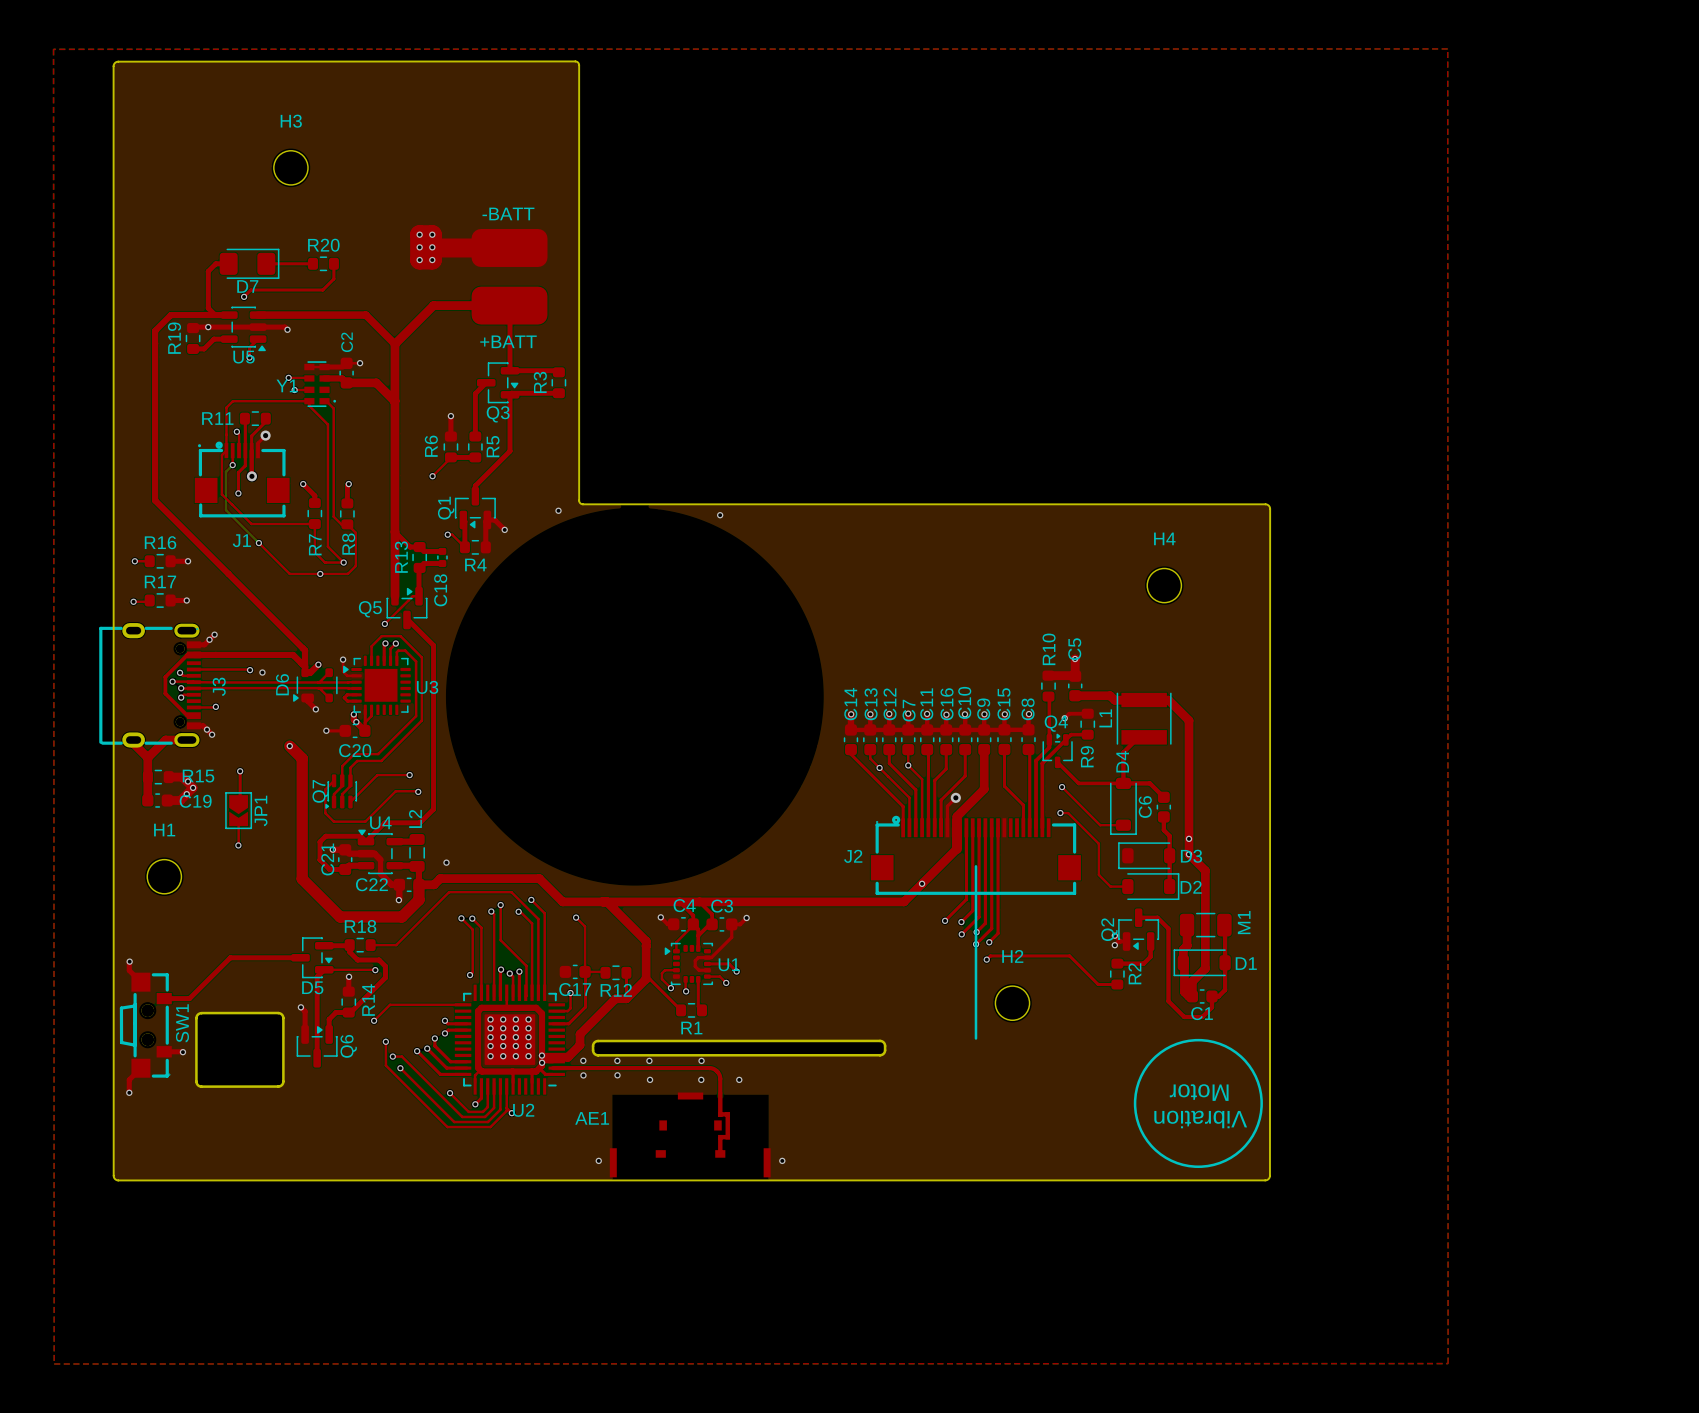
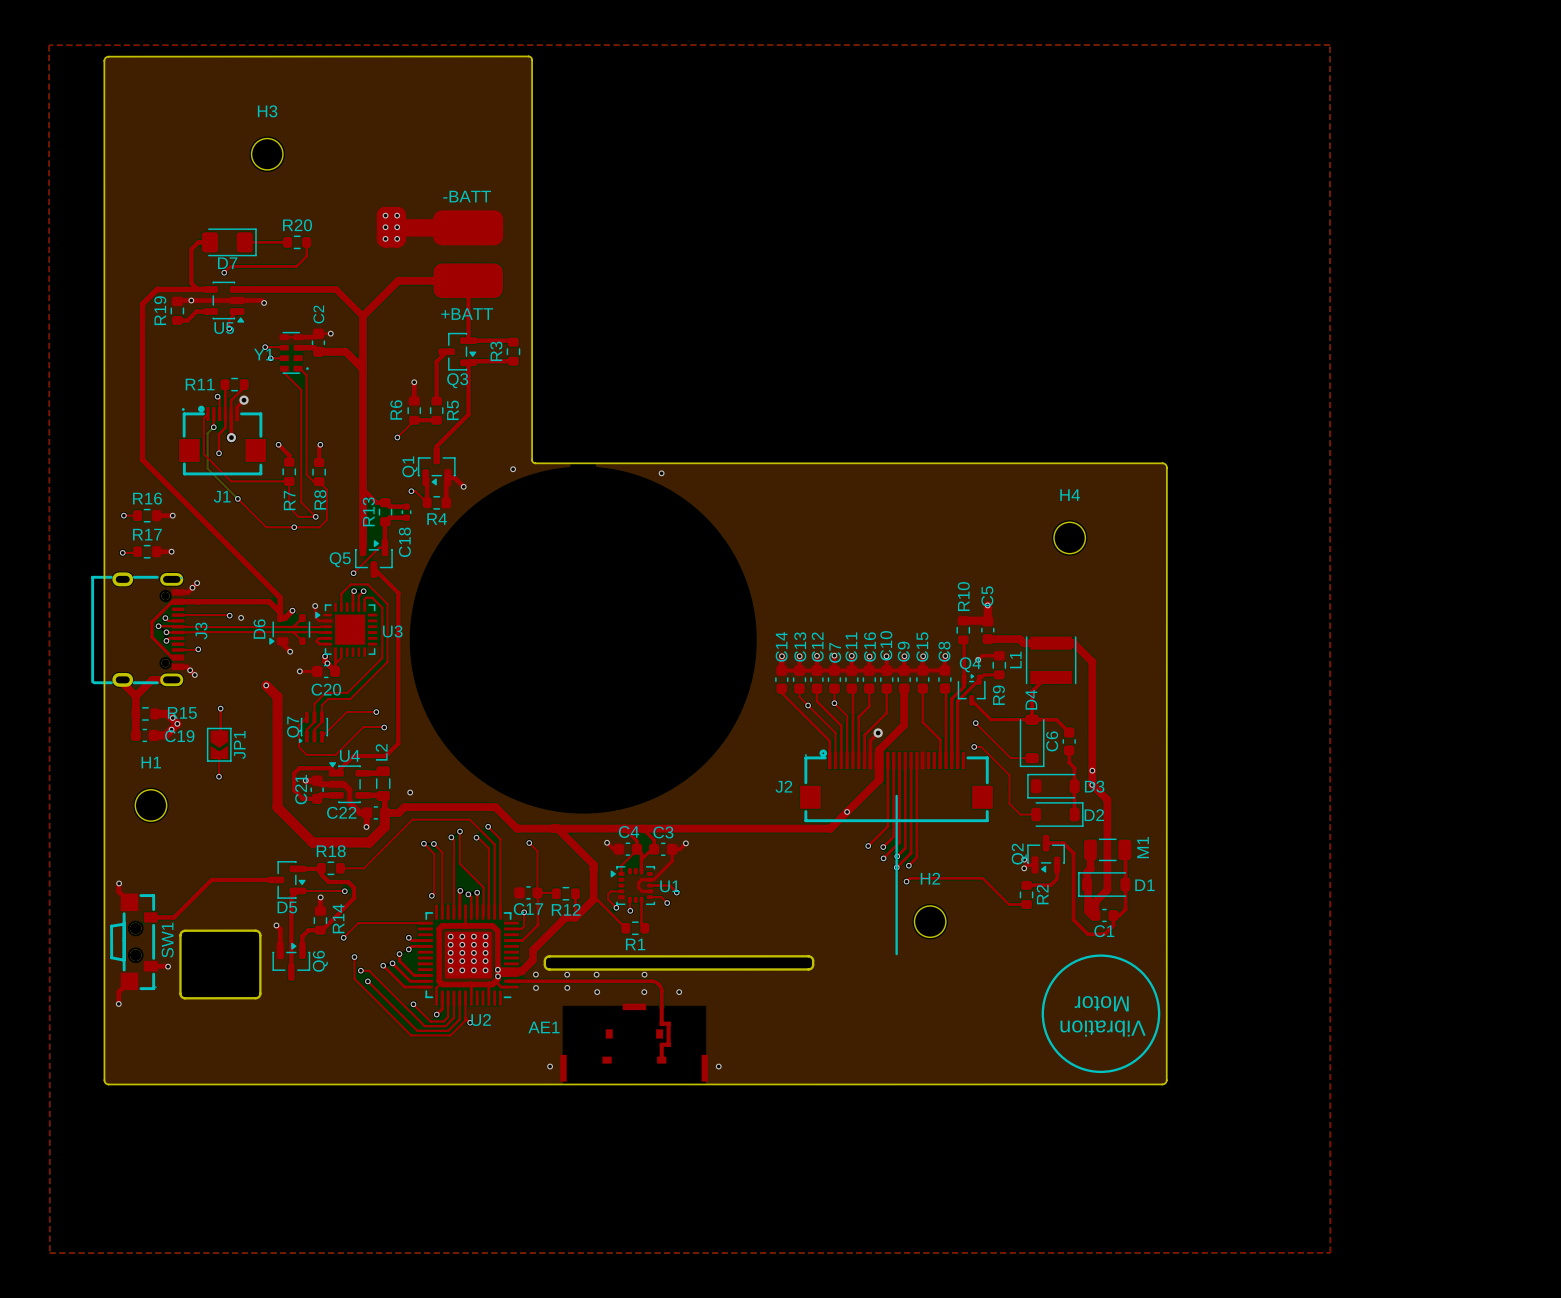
top track: (309, 401) (232, 401) (226, 407) (226, 450) -> none

